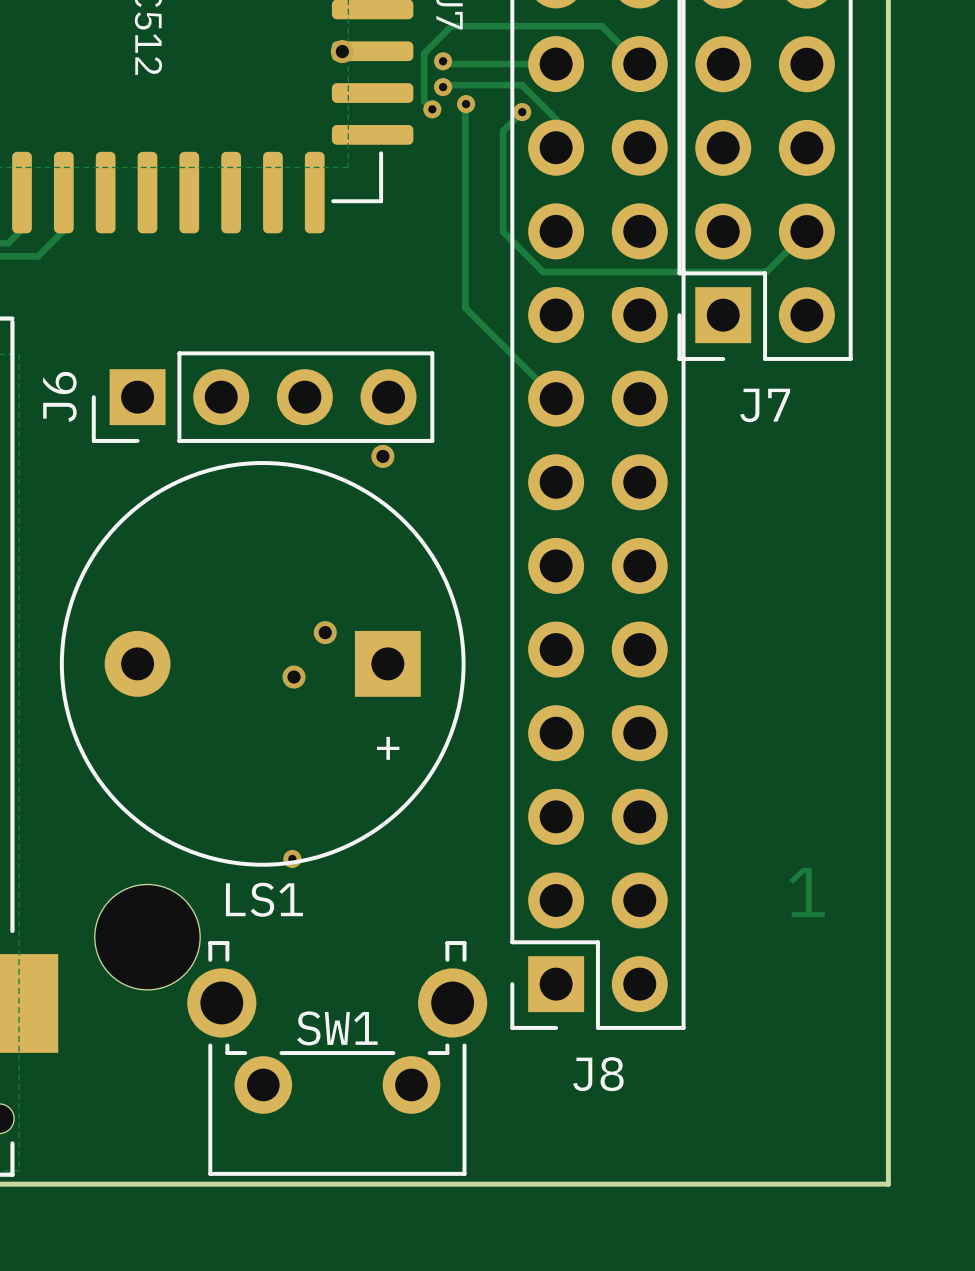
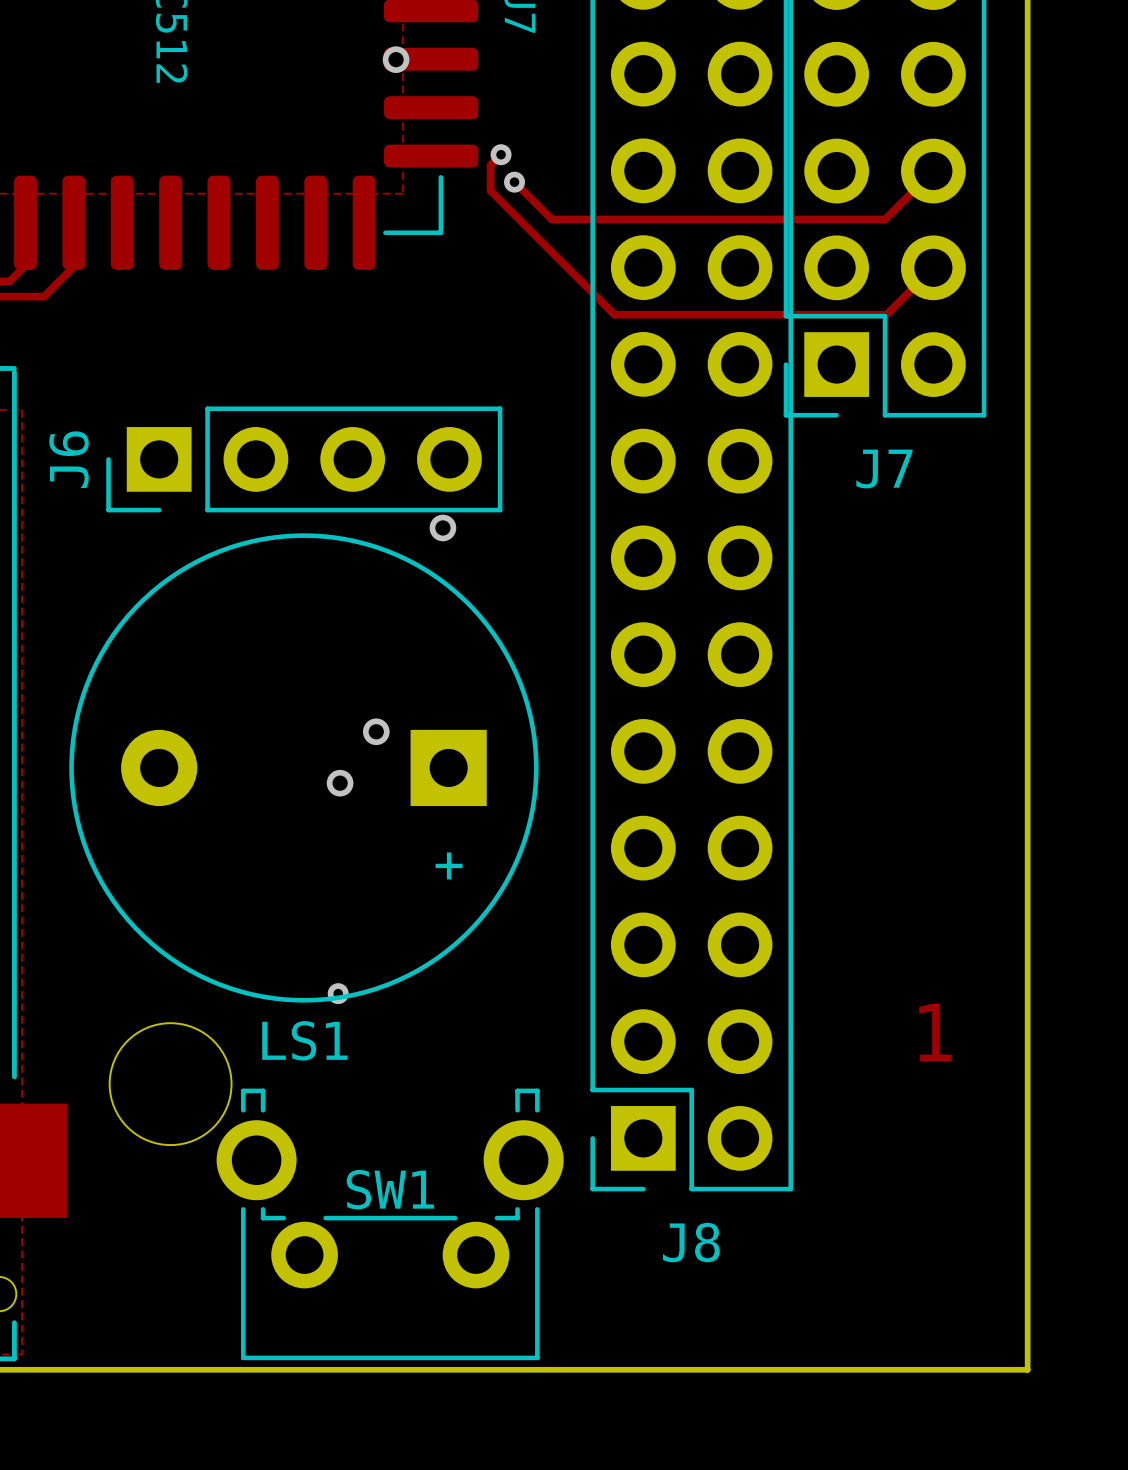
track: (443, 61) (445, 64) (556, 64) -> none
via: (443, 61) -> none
track: (639, 64) (601, 26) (451, 26) (424, 53) (424, 101) (432, 109) -> none
track: (443, 87) (445, 85) (522, 85) (556, 119) (556, 147) -> none
via: (443, 87) -> none
track: (466, 104) (465, 307) (556, 398) -> none
via: (466, 104) -> none
via: (432, 109) -> none
track: (522, 112) (503, 131) (503, 231) (543, 272) -> (501, 154) (490, 165) (490, 190) (614, 314) (628, 314)
via: (522, 112) -> none
via: none -> (501, 154)
track: none -> (933, 171) (885, 219) (551, 219) (514, 182)
via: none -> (514, 182)

